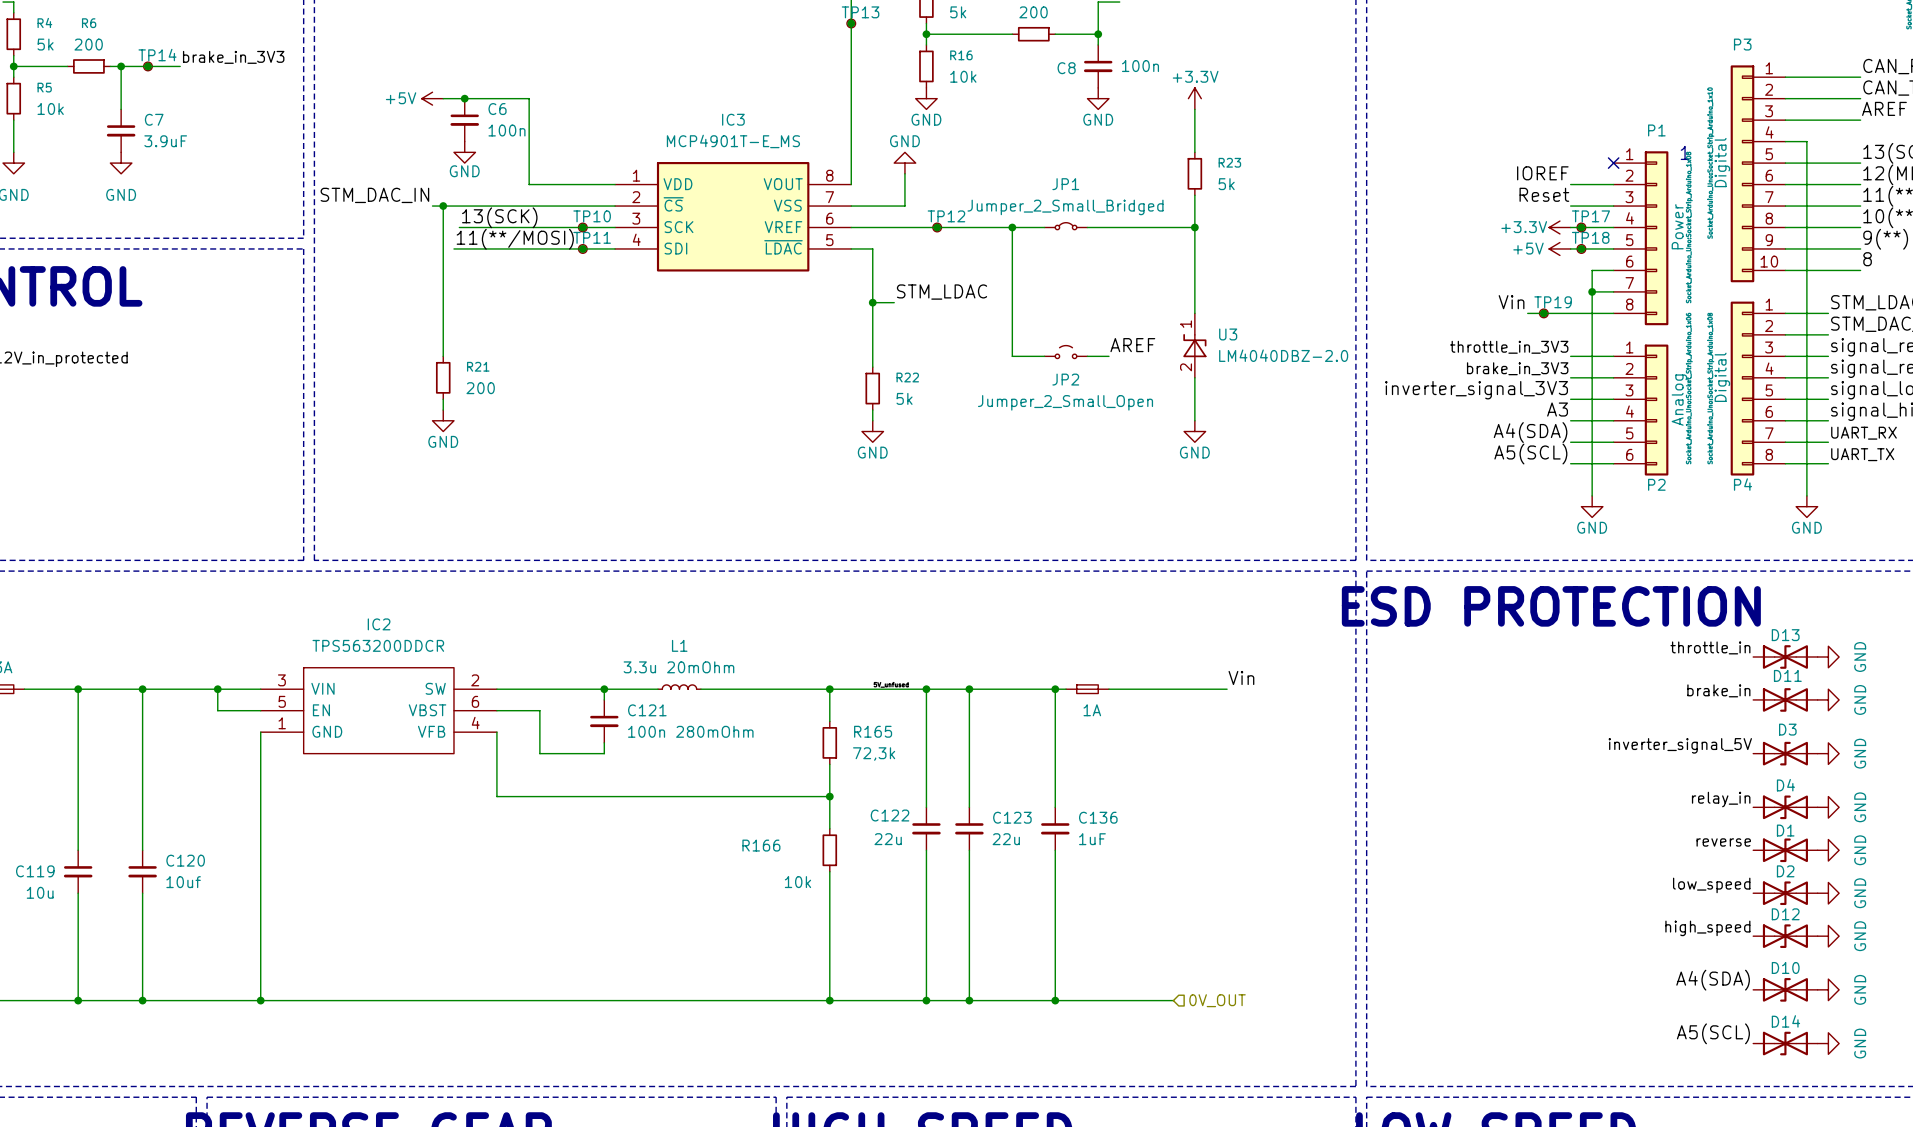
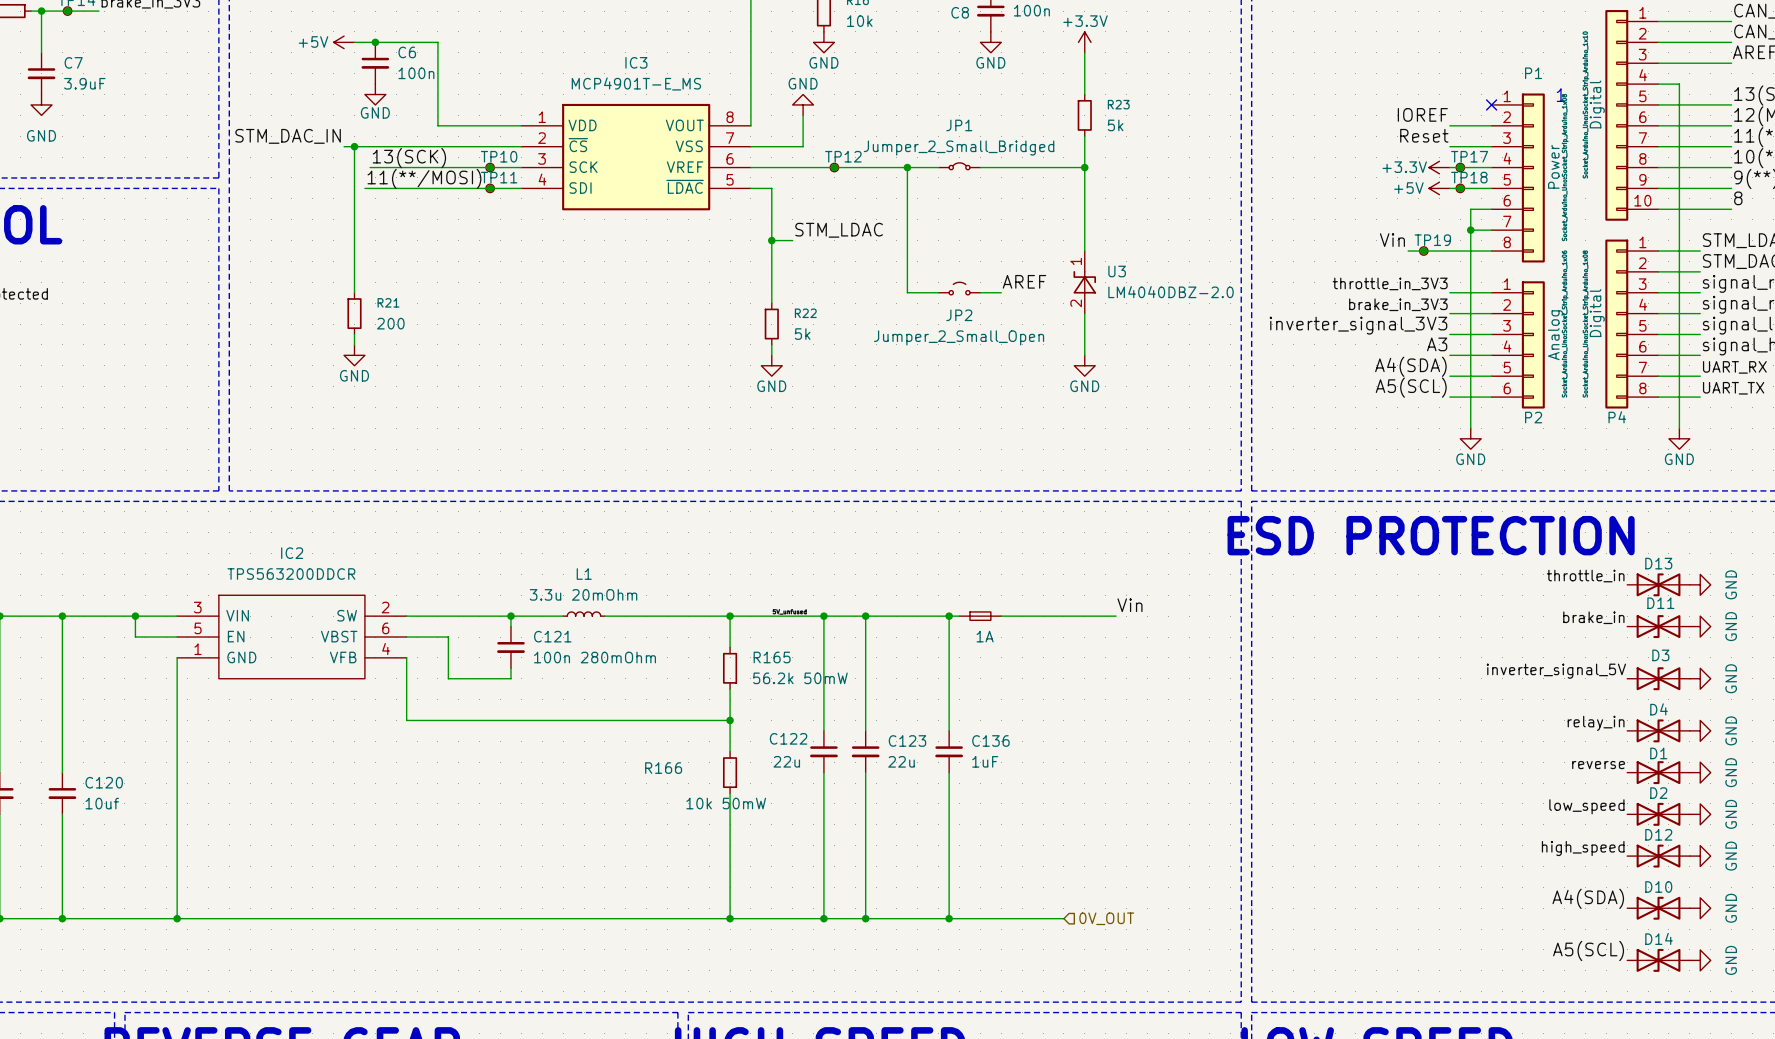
R165 value: 72,3k (874, 754) -> 56.2k 50mW (800, 678)
R166 value: 10k (797, 882) -> 10k 50mW (726, 803)

